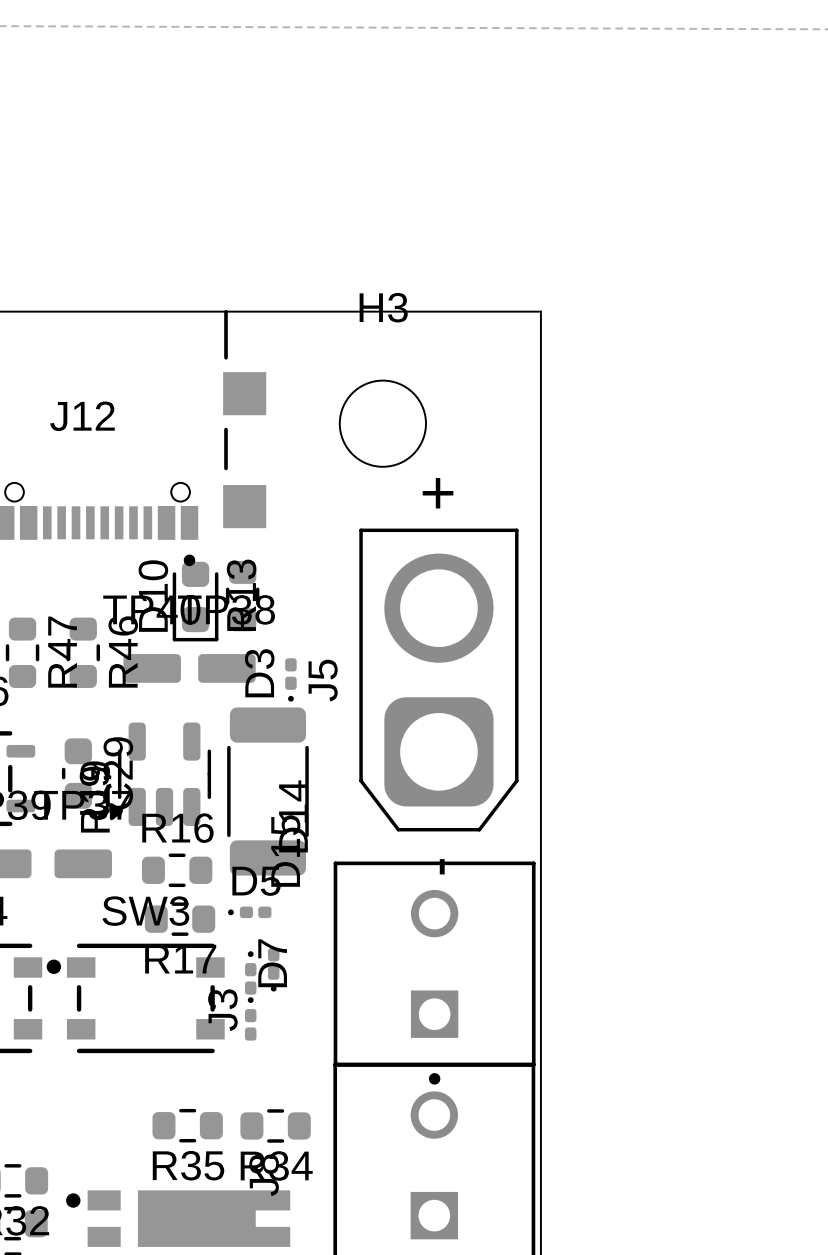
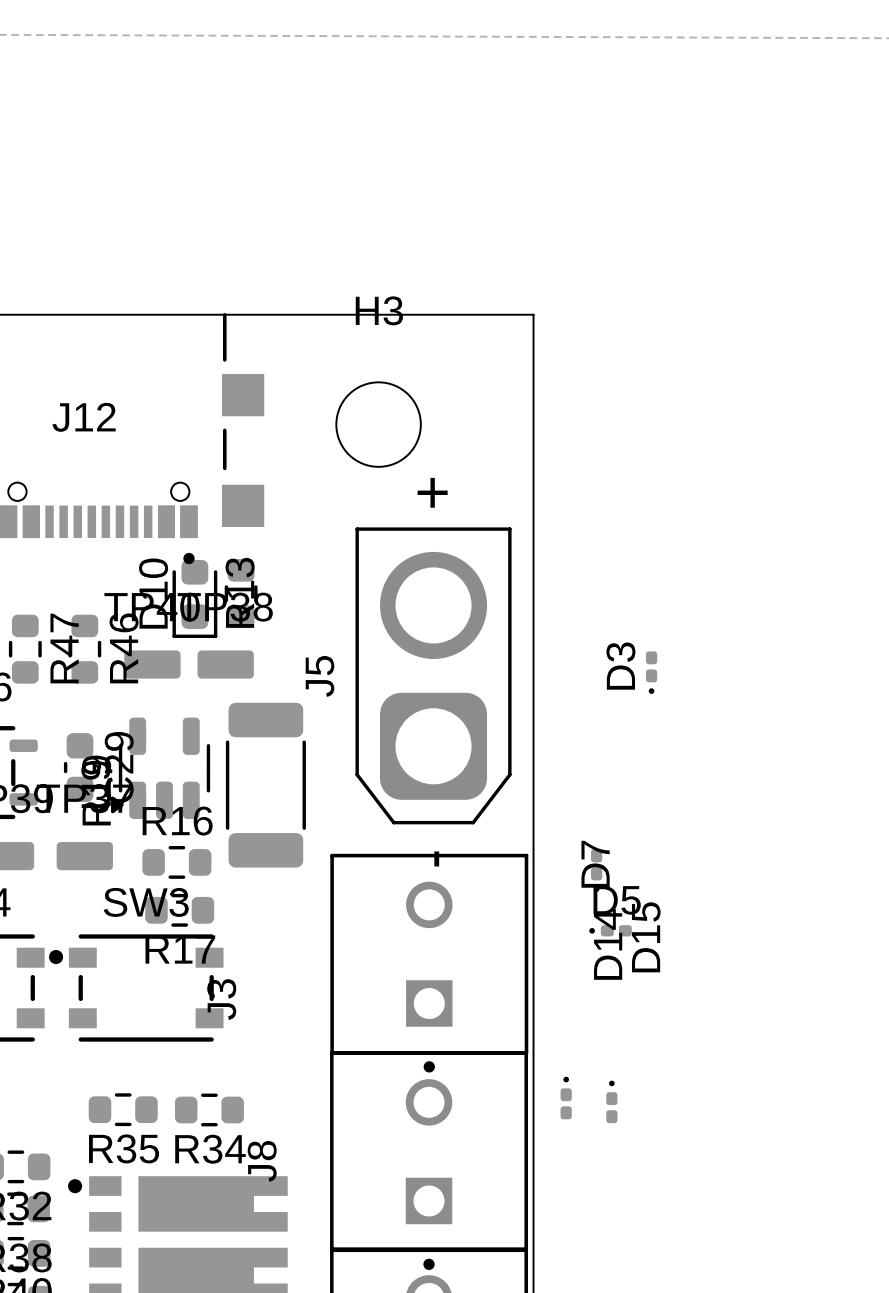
D3 position: (290, 679) -> (651, 672)
D5 position: (249, 912) -> (610, 930)
D7 position: (273, 969) -> (596, 870)
D14 position: (250, 972) -> (566, 1098)
D15 position: (250, 1018) -> (611, 1101)
R35 position: (187, 1125) -> (123, 1109)
R34 position: (275, 1125) -> (209, 1109)

